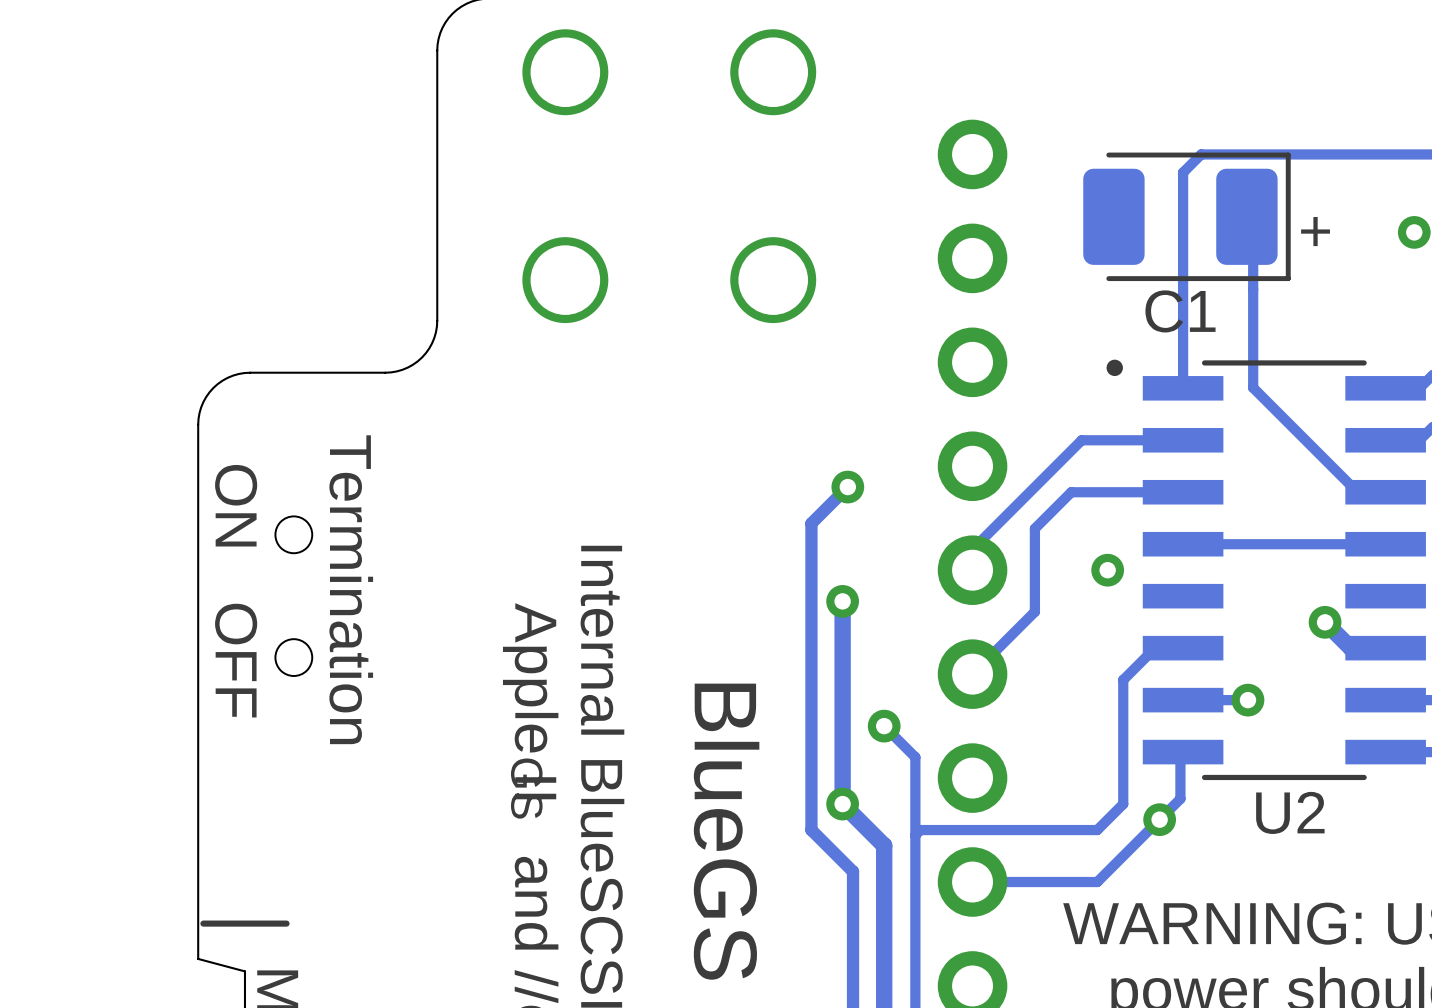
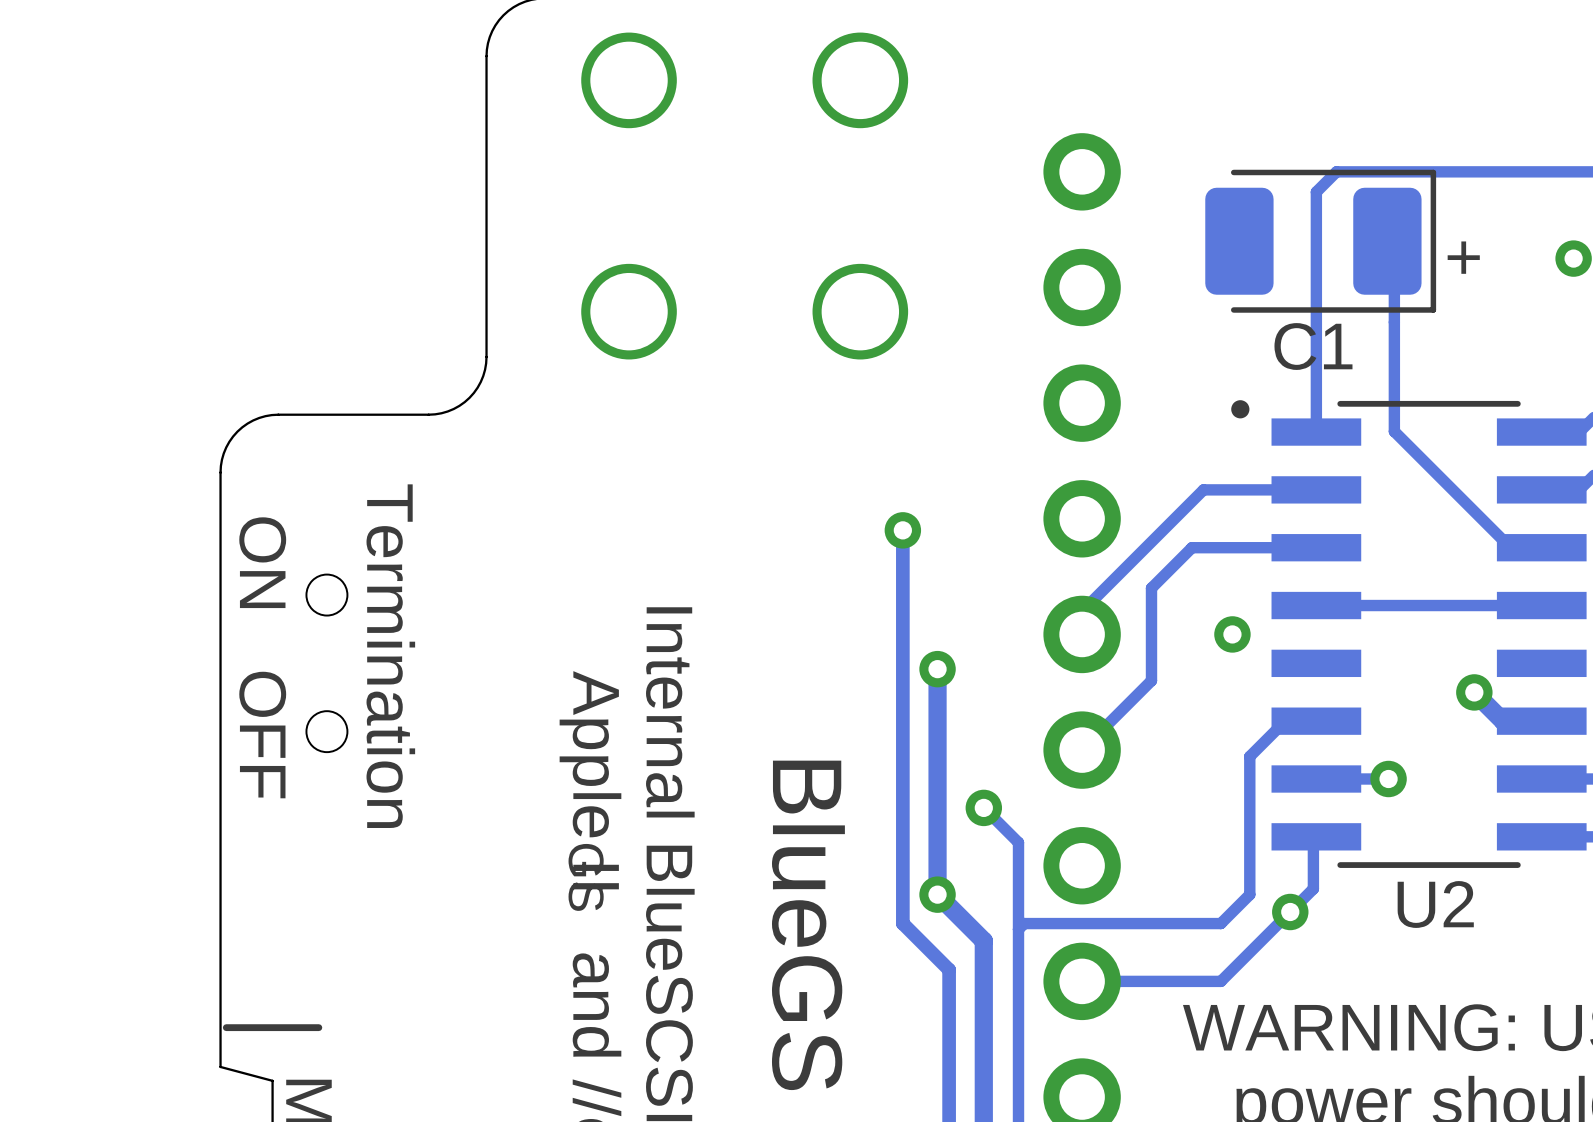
track: (847, 487) (811, 523) -> (902, 530) (902, 582)
via position: (847, 487) -> (902, 530)

